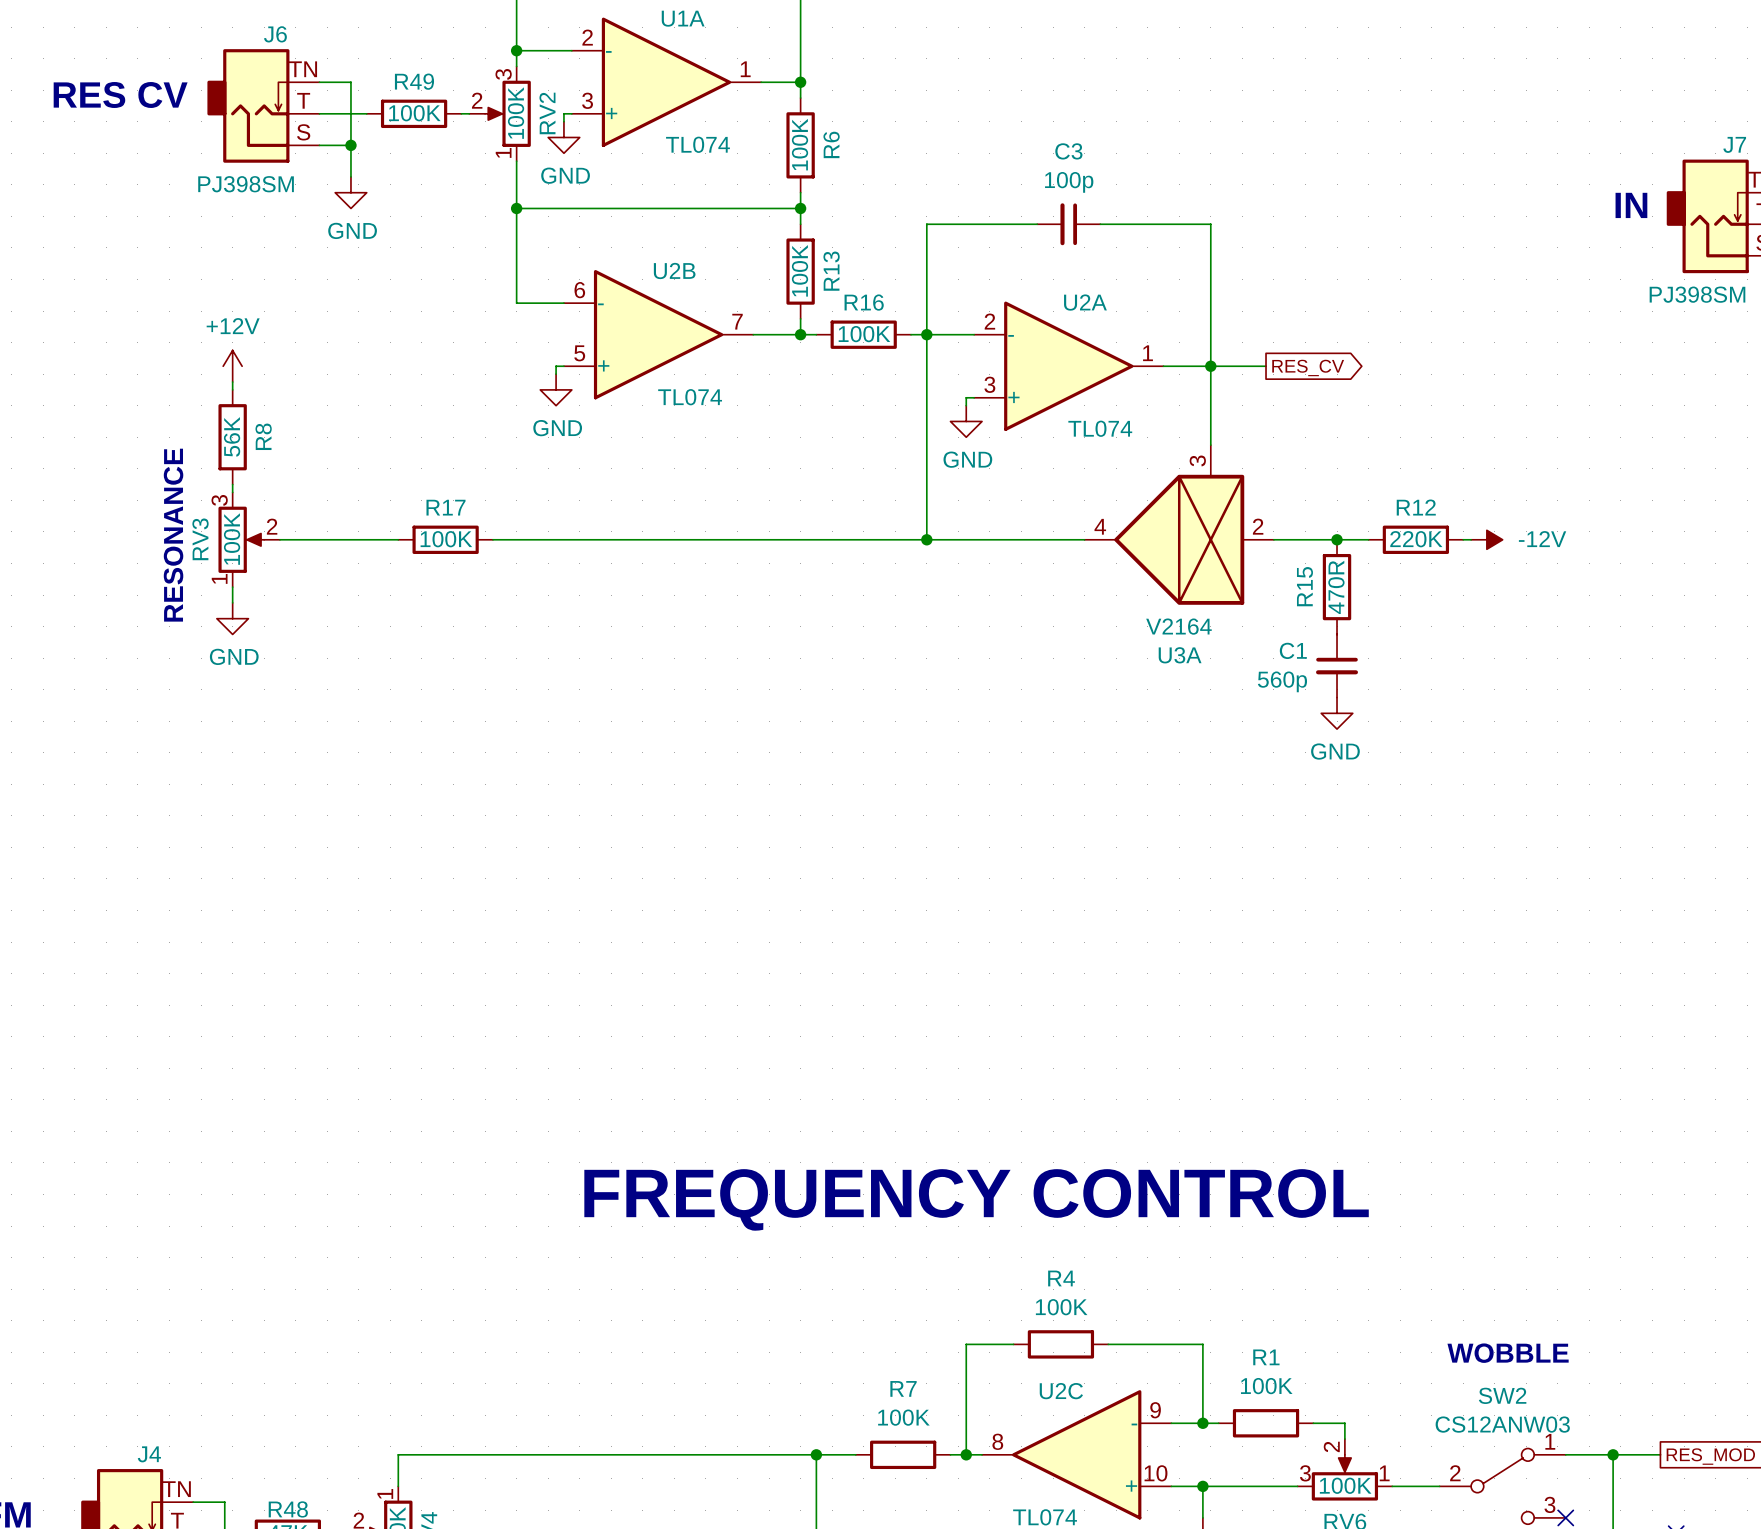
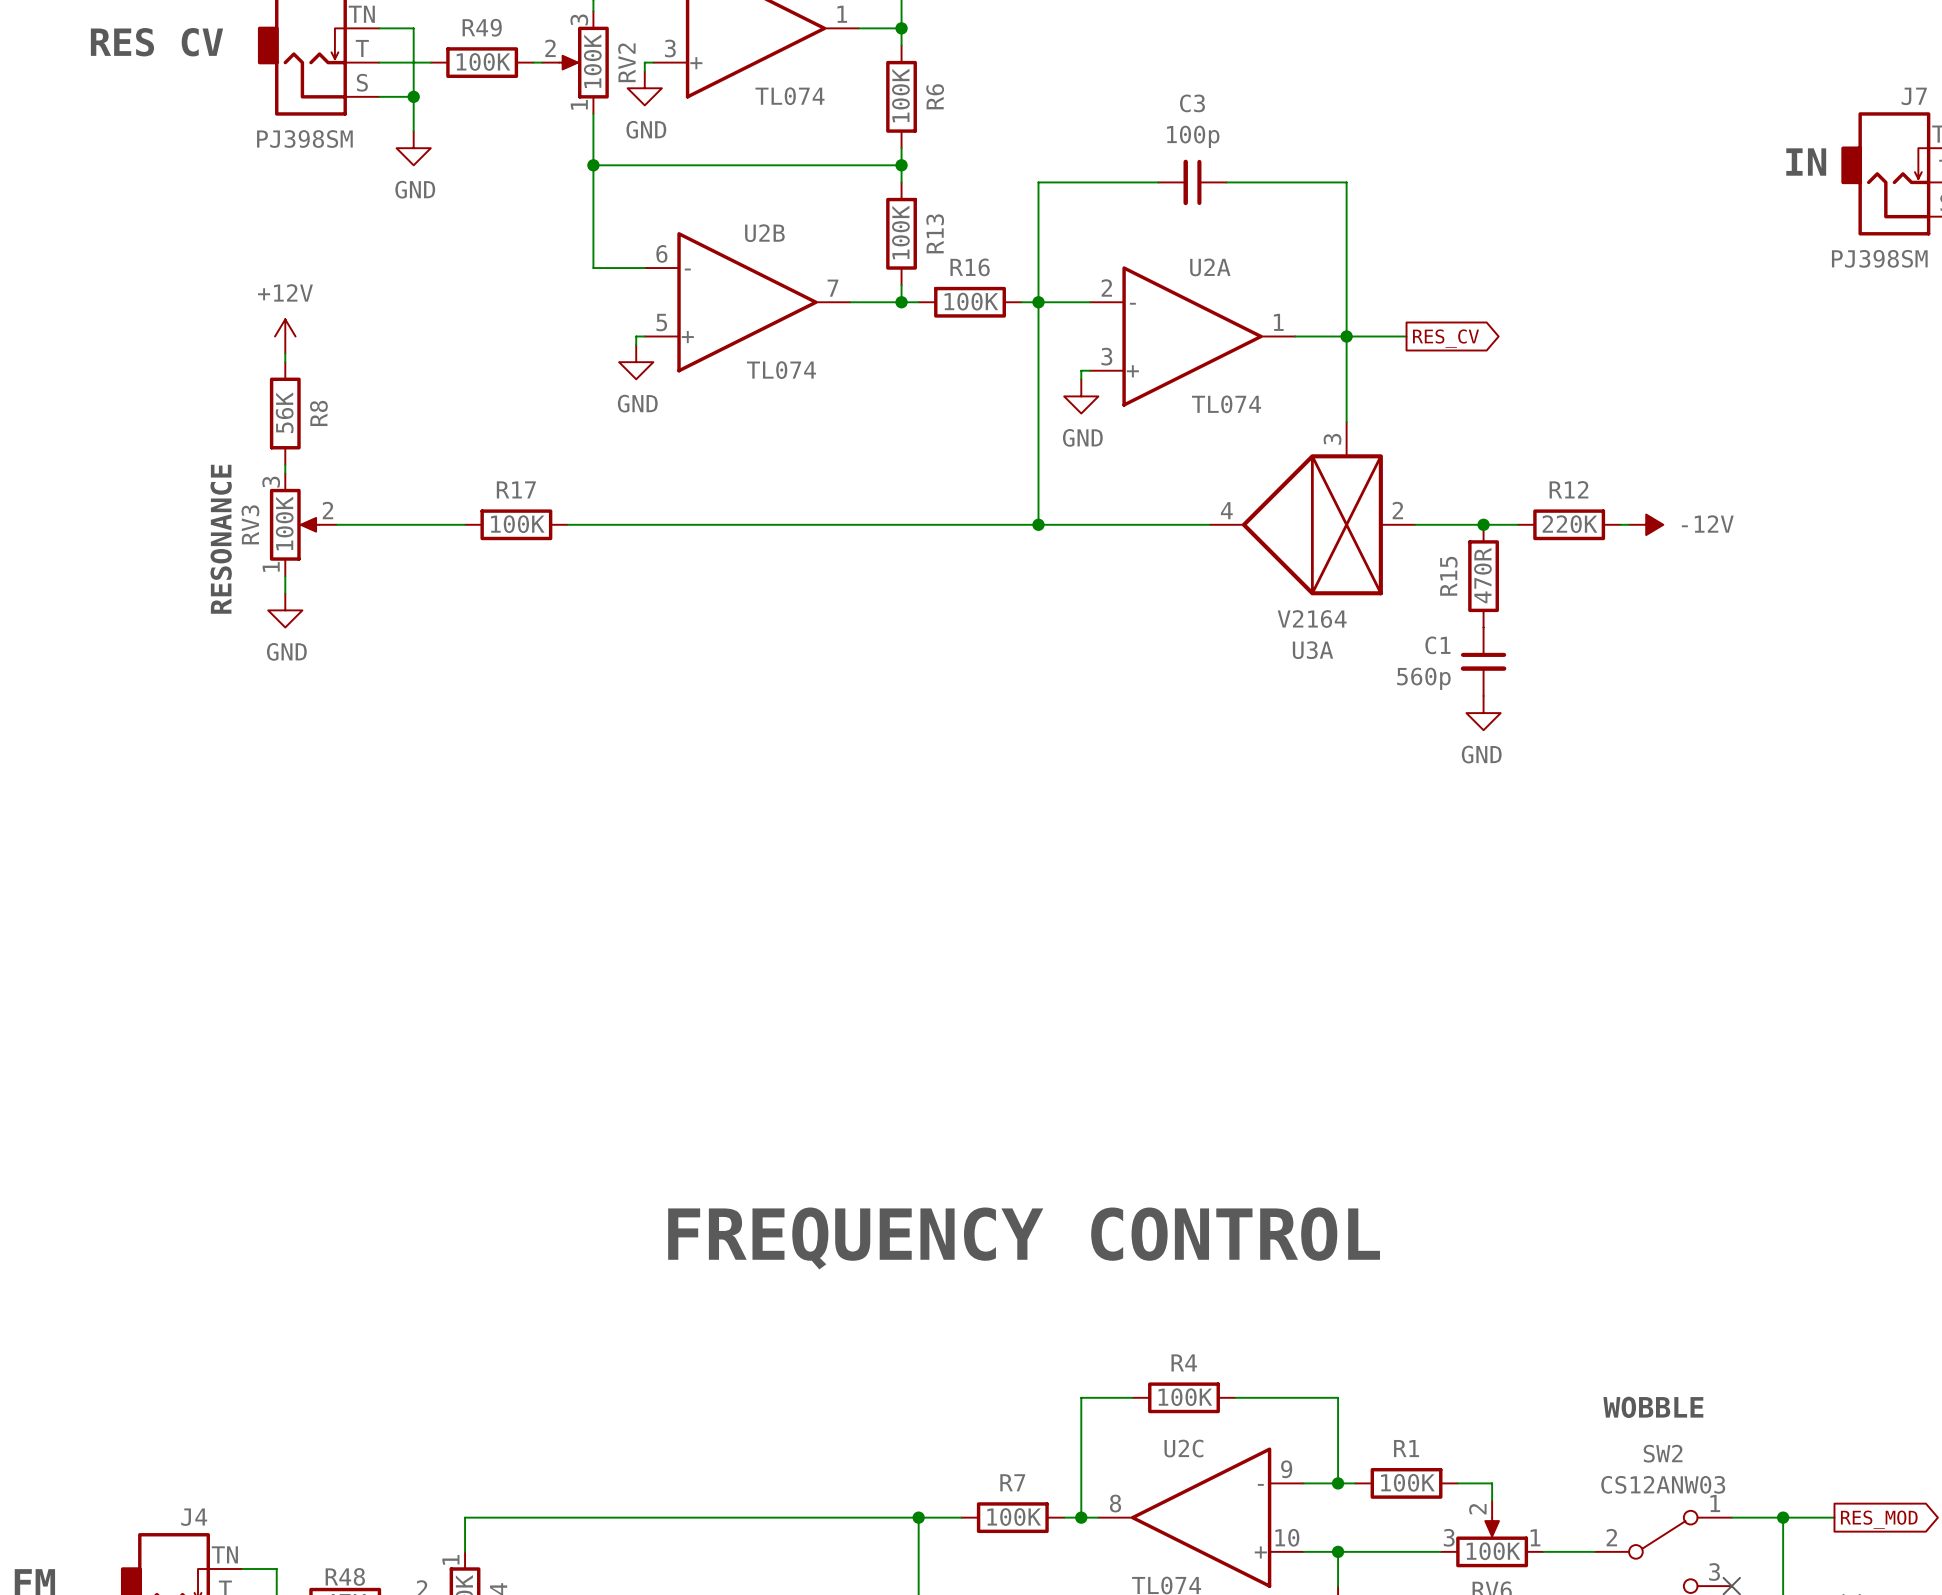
R4 name position: R4 (1061, 1278) -> R4 (1184, 1362)
R4 value position: 100K (1061, 1307) -> 100K (1185, 1397)
R1 name position: R1 (1266, 1357) -> R1 (1406, 1448)
R1 value position: 100K (1266, 1386) -> 100K (1407, 1482)
R7 name position: R7 (903, 1388) -> R7 (1012, 1482)
R7 value position: 100K (903, 1417) -> 100K (1014, 1517)

